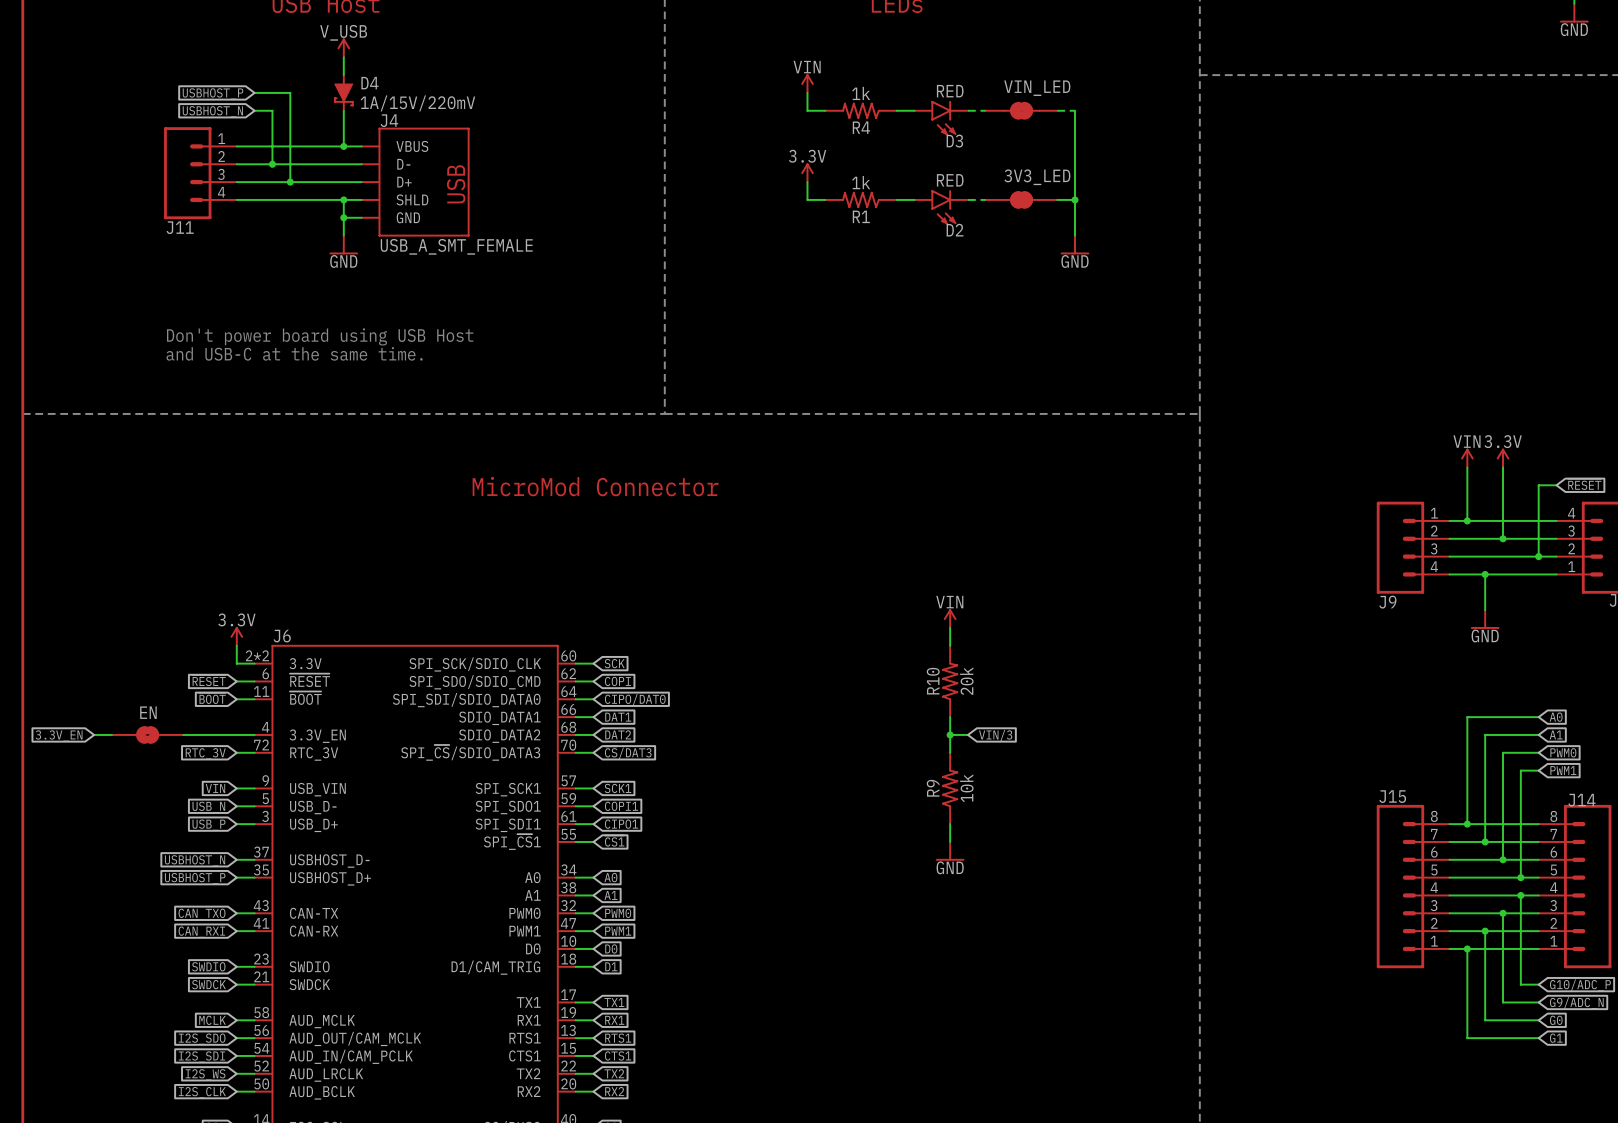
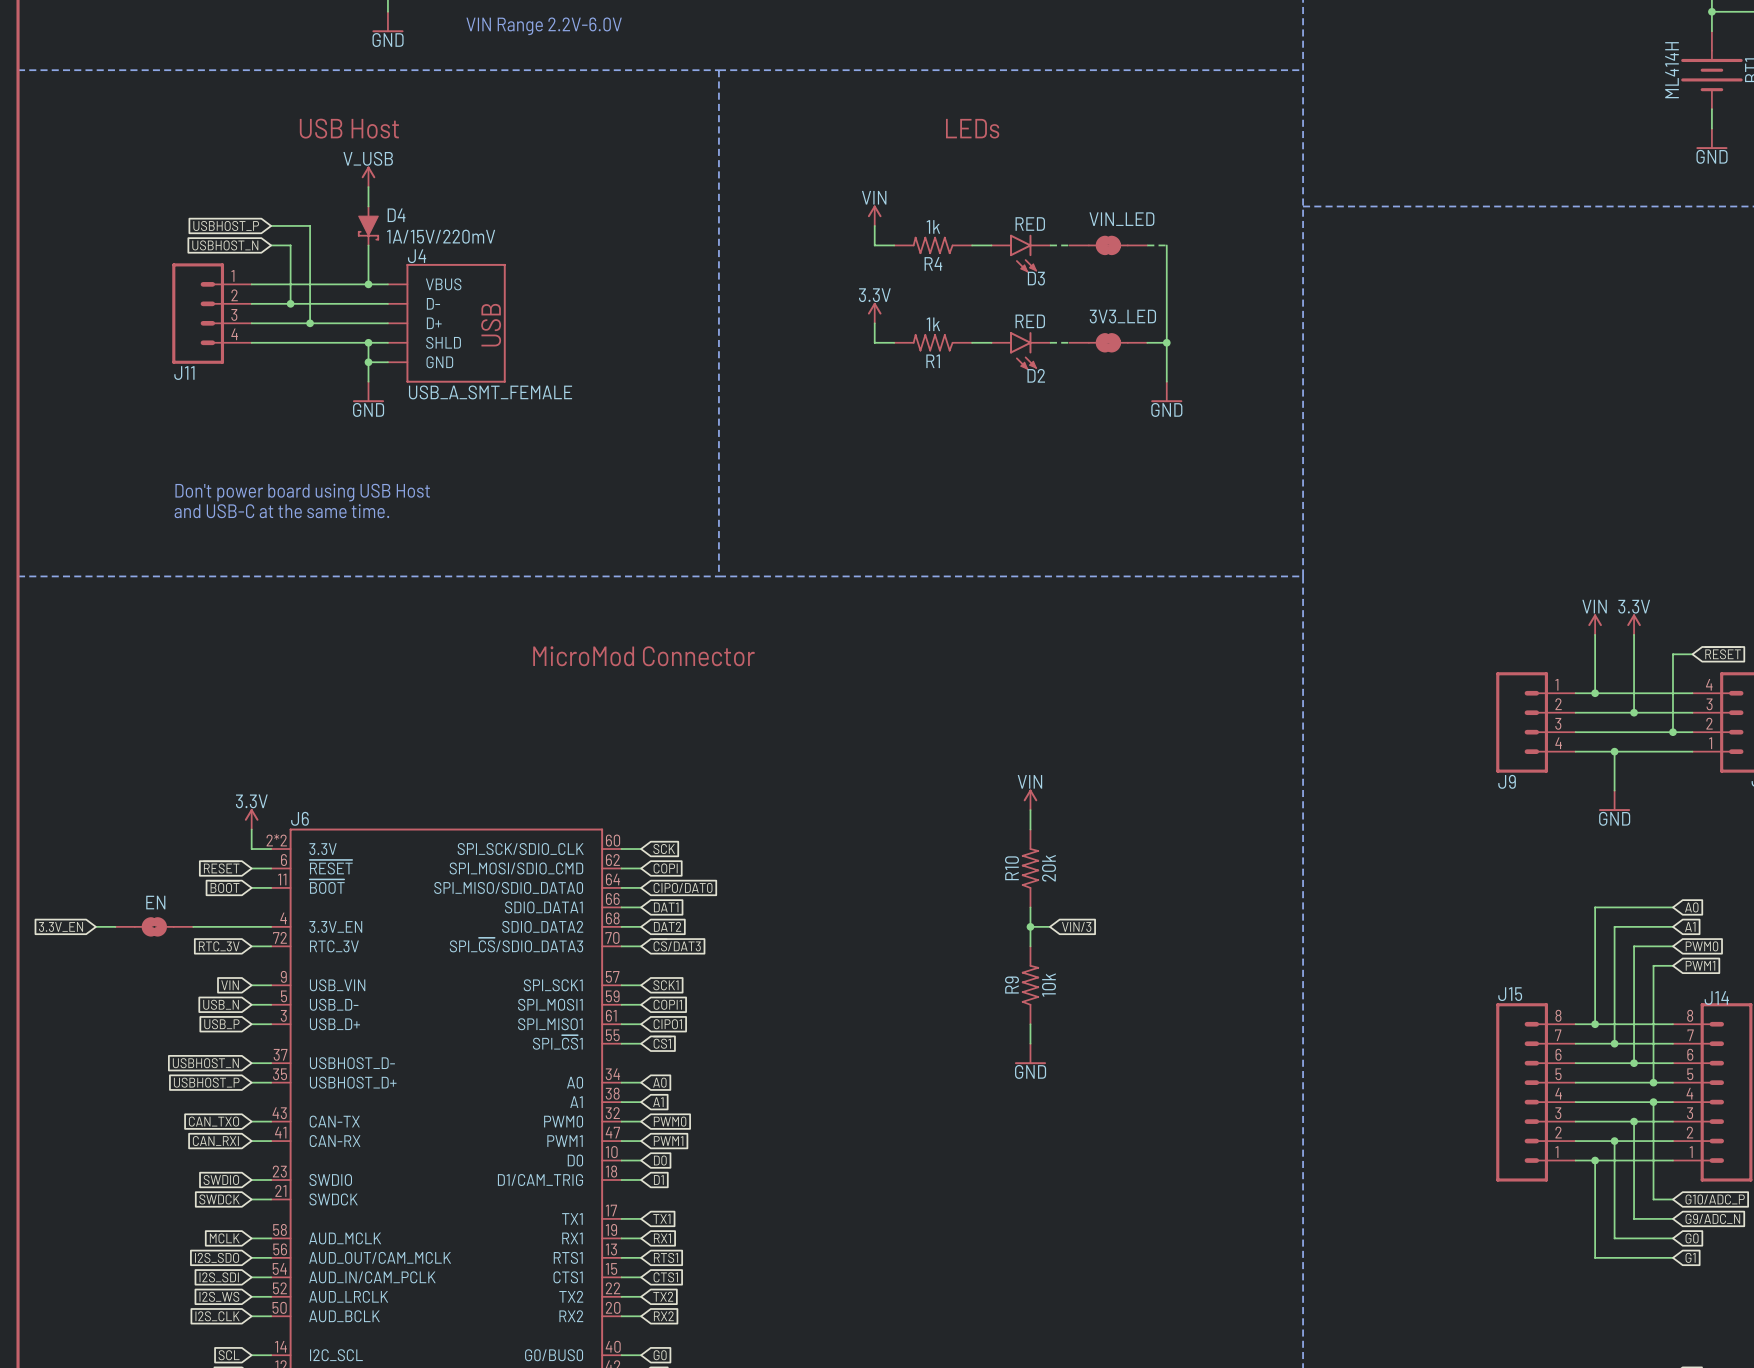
J6 pin name: SPI_SDO/SDIO_CMD (475, 682) -> SPI_MOSI/SDIO_CMD (516, 868)
J6 pin name: SPI_SDI/SDIO_DATA0 (466, 700) -> SPI_MISO/SDIO_DATA0 (508, 887)
J6 pin name: SPI_SDO1 (508, 807) -> SPI_MOSI1 (550, 1004)
J6 pin name: SPI_SDI1 (508, 825) -> SPI_MISO1 (550, 1024)

